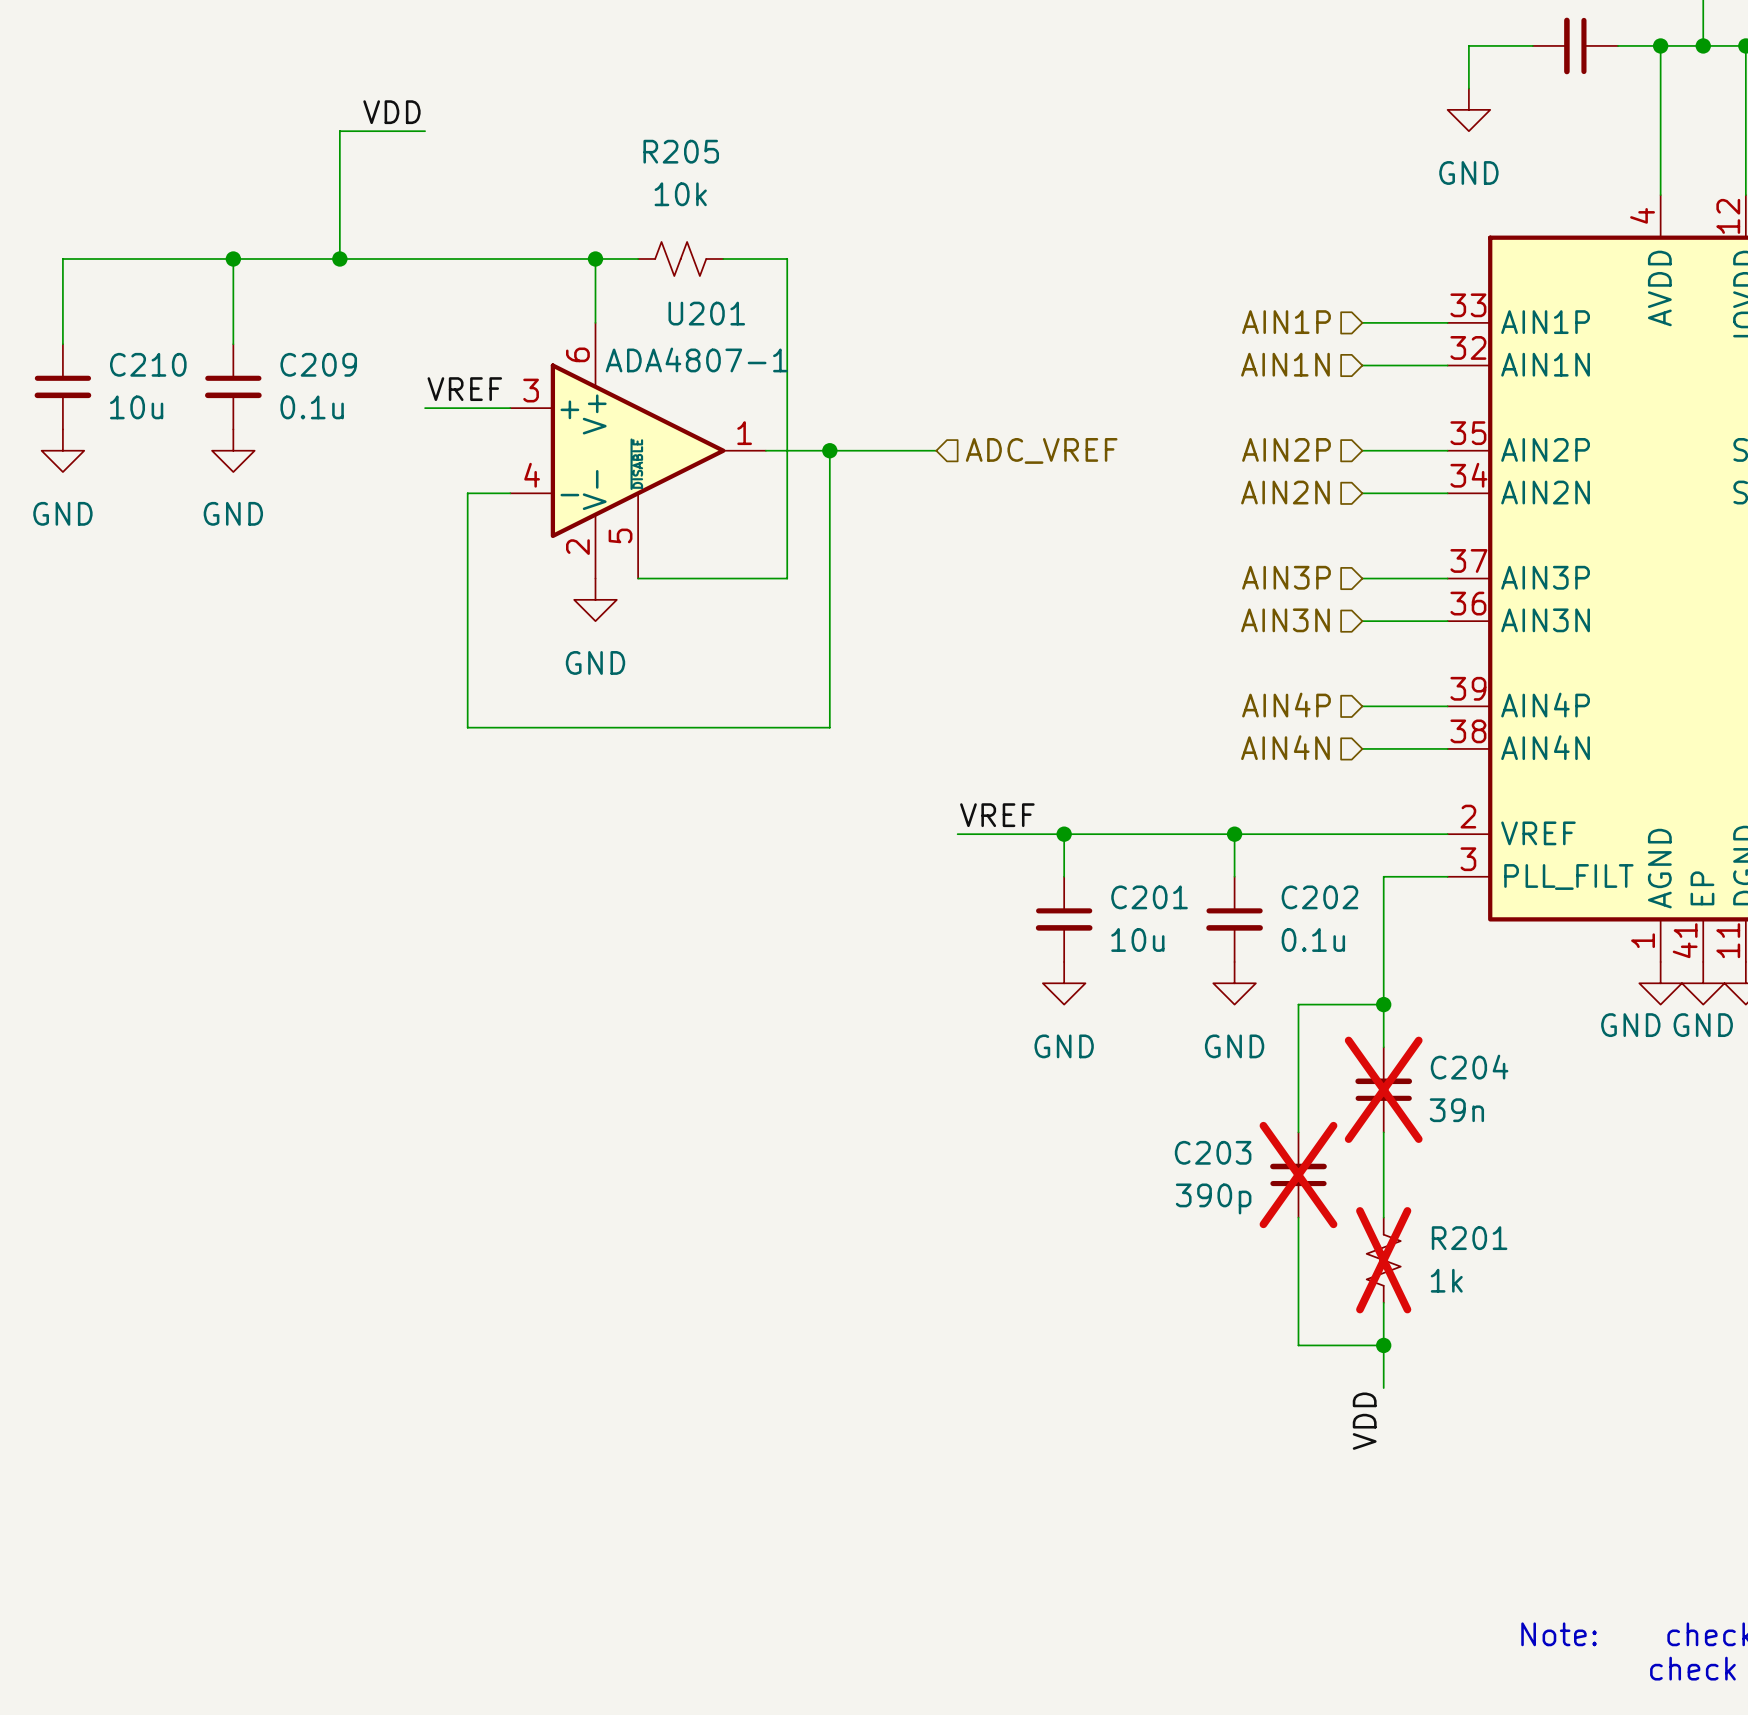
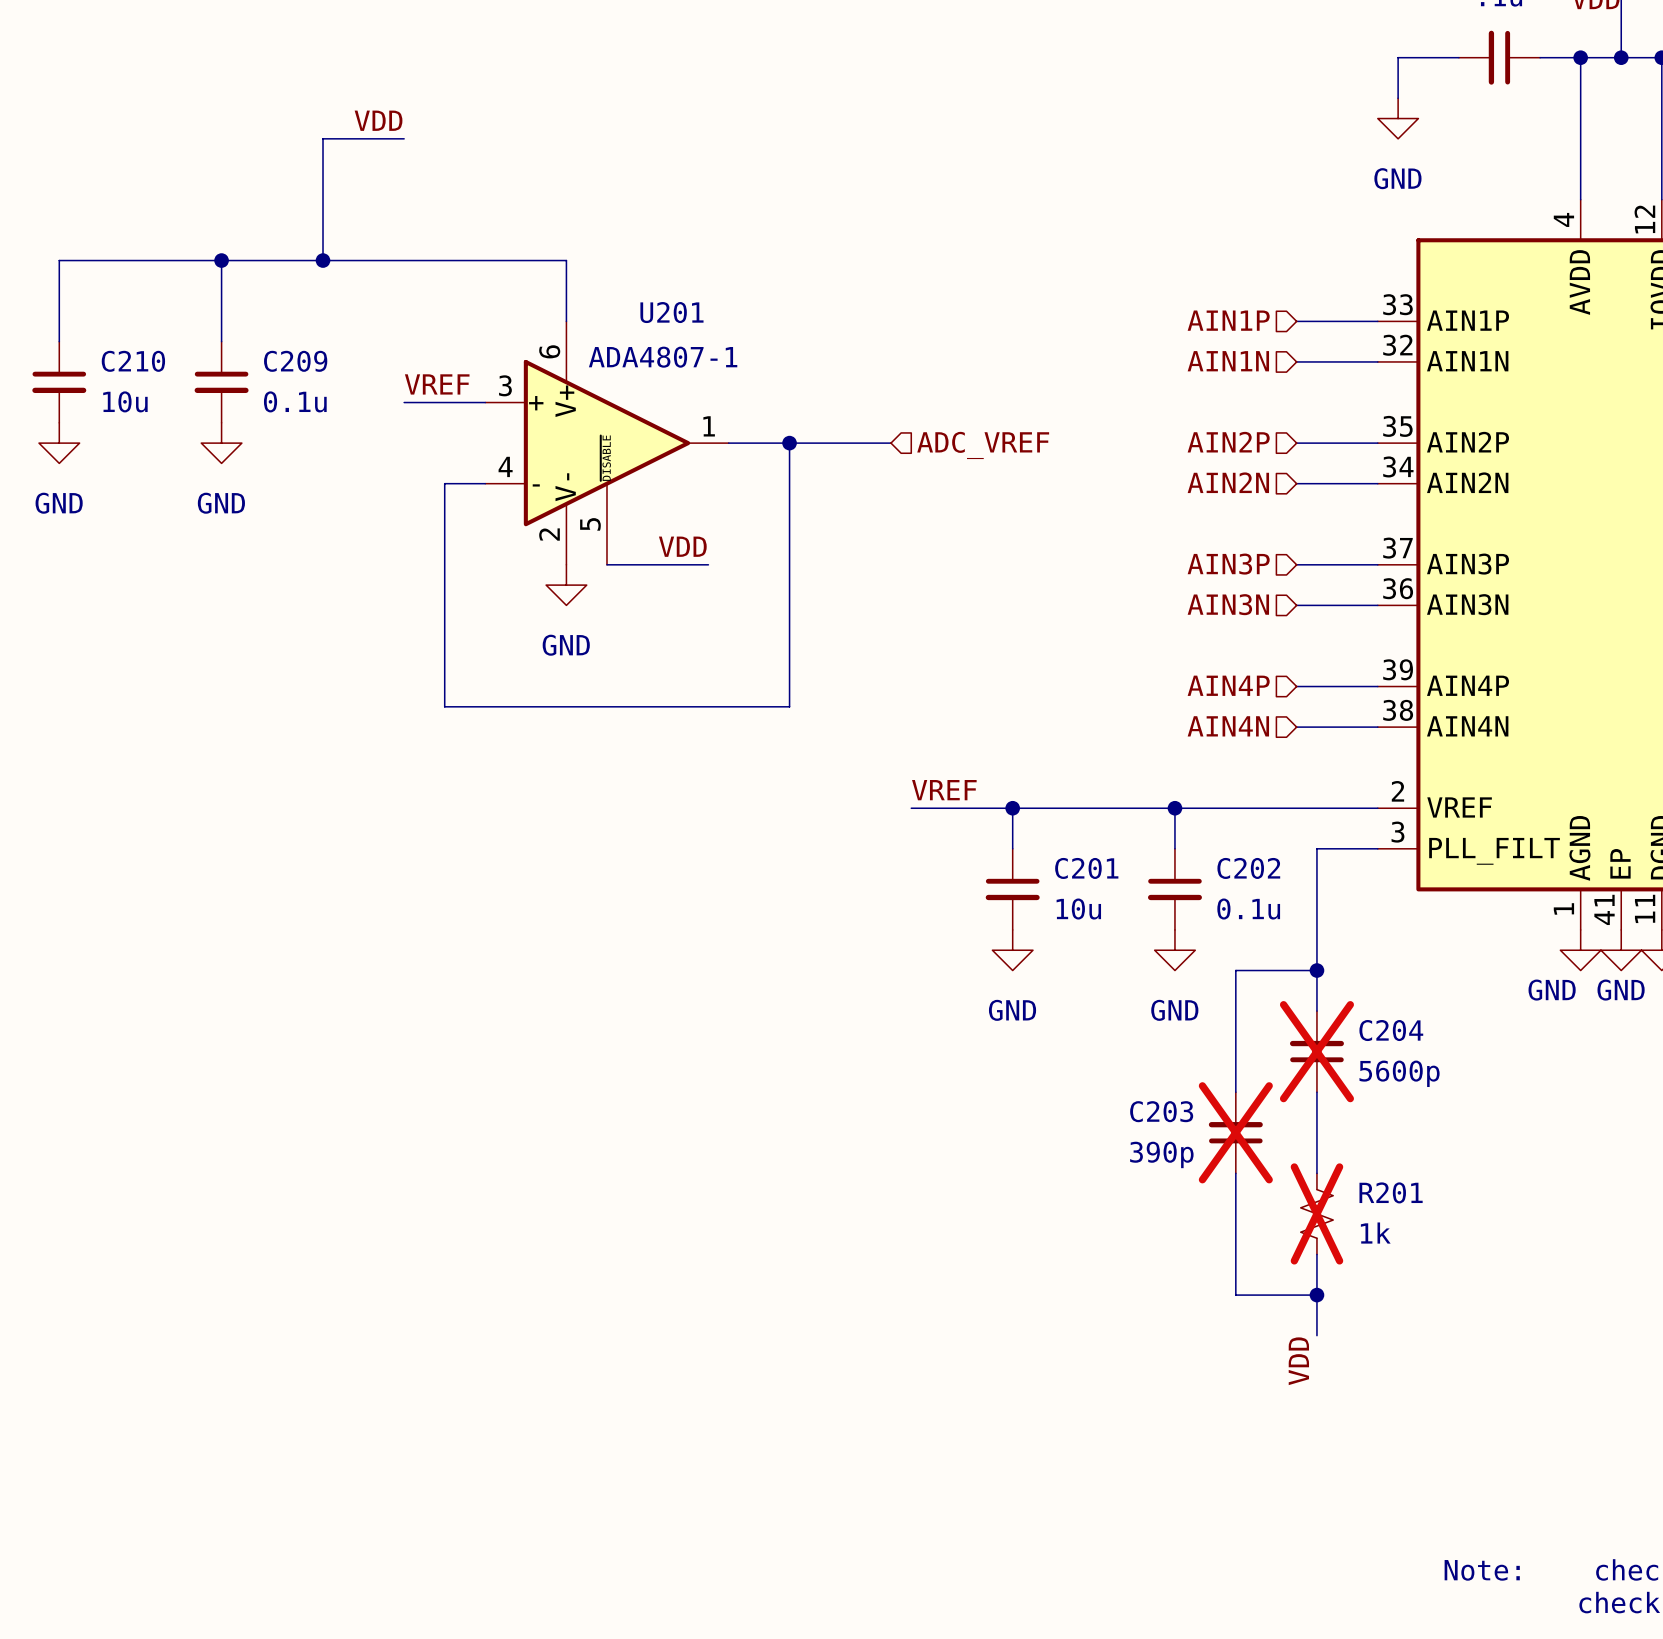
wire: (595, 258) (638, 258) -> none
junction: (595, 258) -> none
R205: 10k (680, 258) -> none
wire: (723, 258) (787, 258) (787, 578) (744, 578) -> none
label: none -> VDD (682, 546)
C204 value: 39n (1456, 1110) -> 5600p (1399, 1073)

